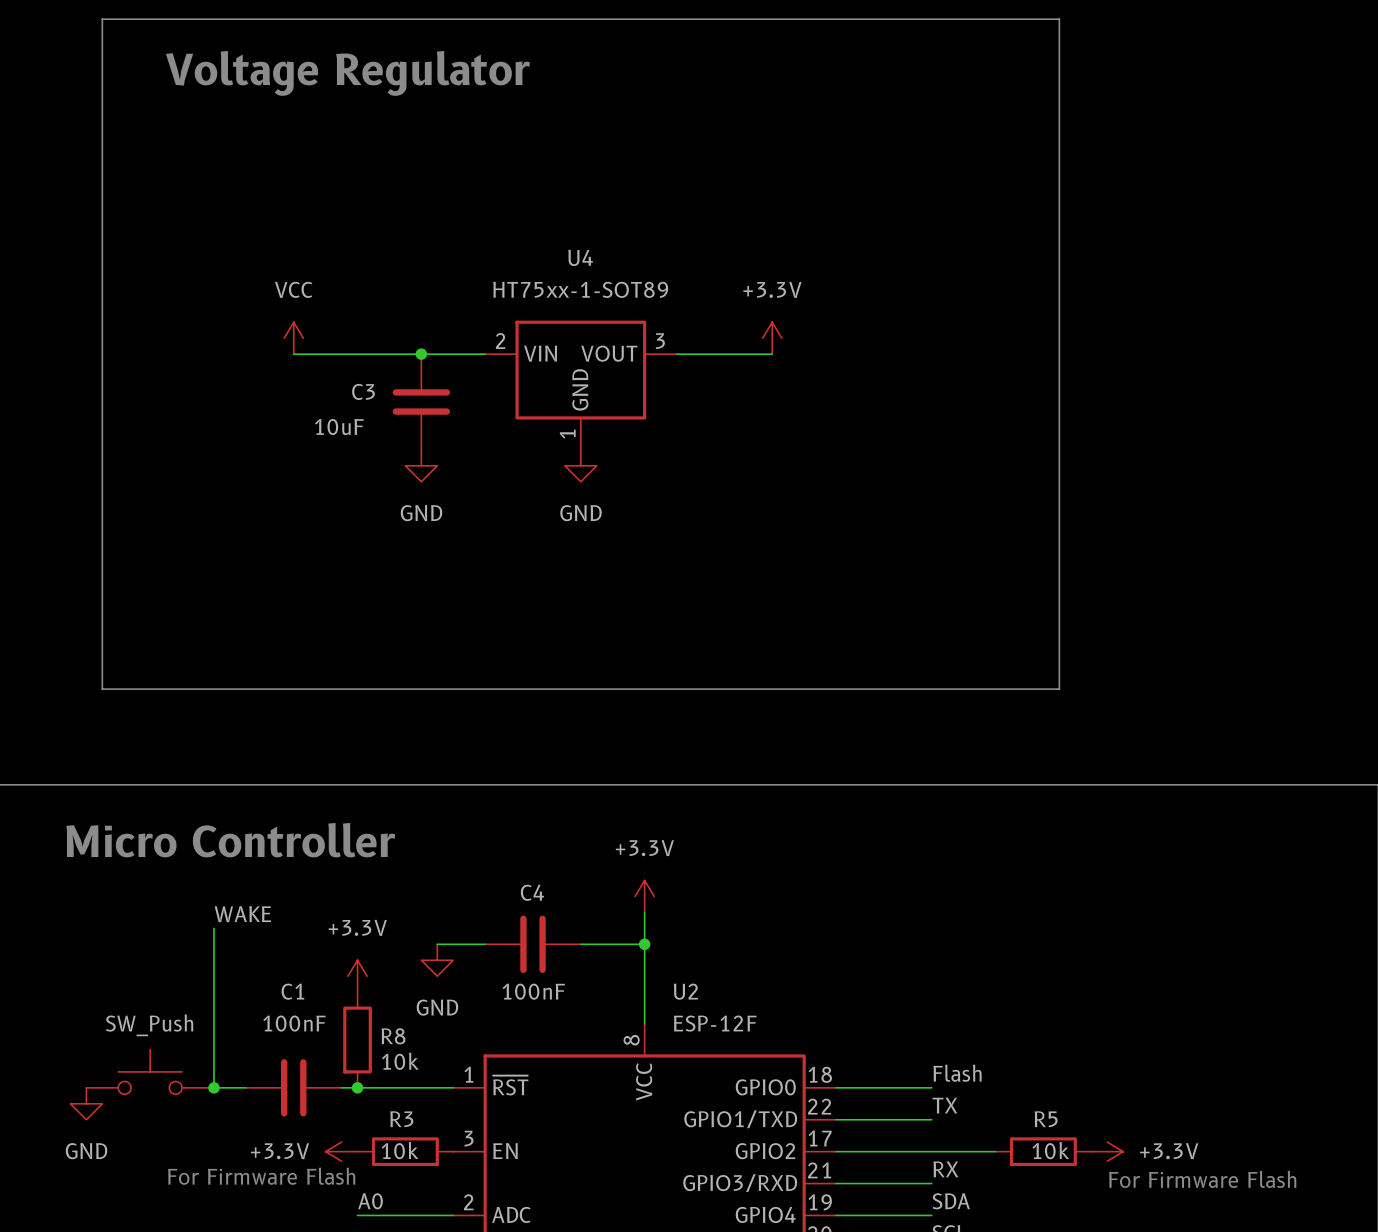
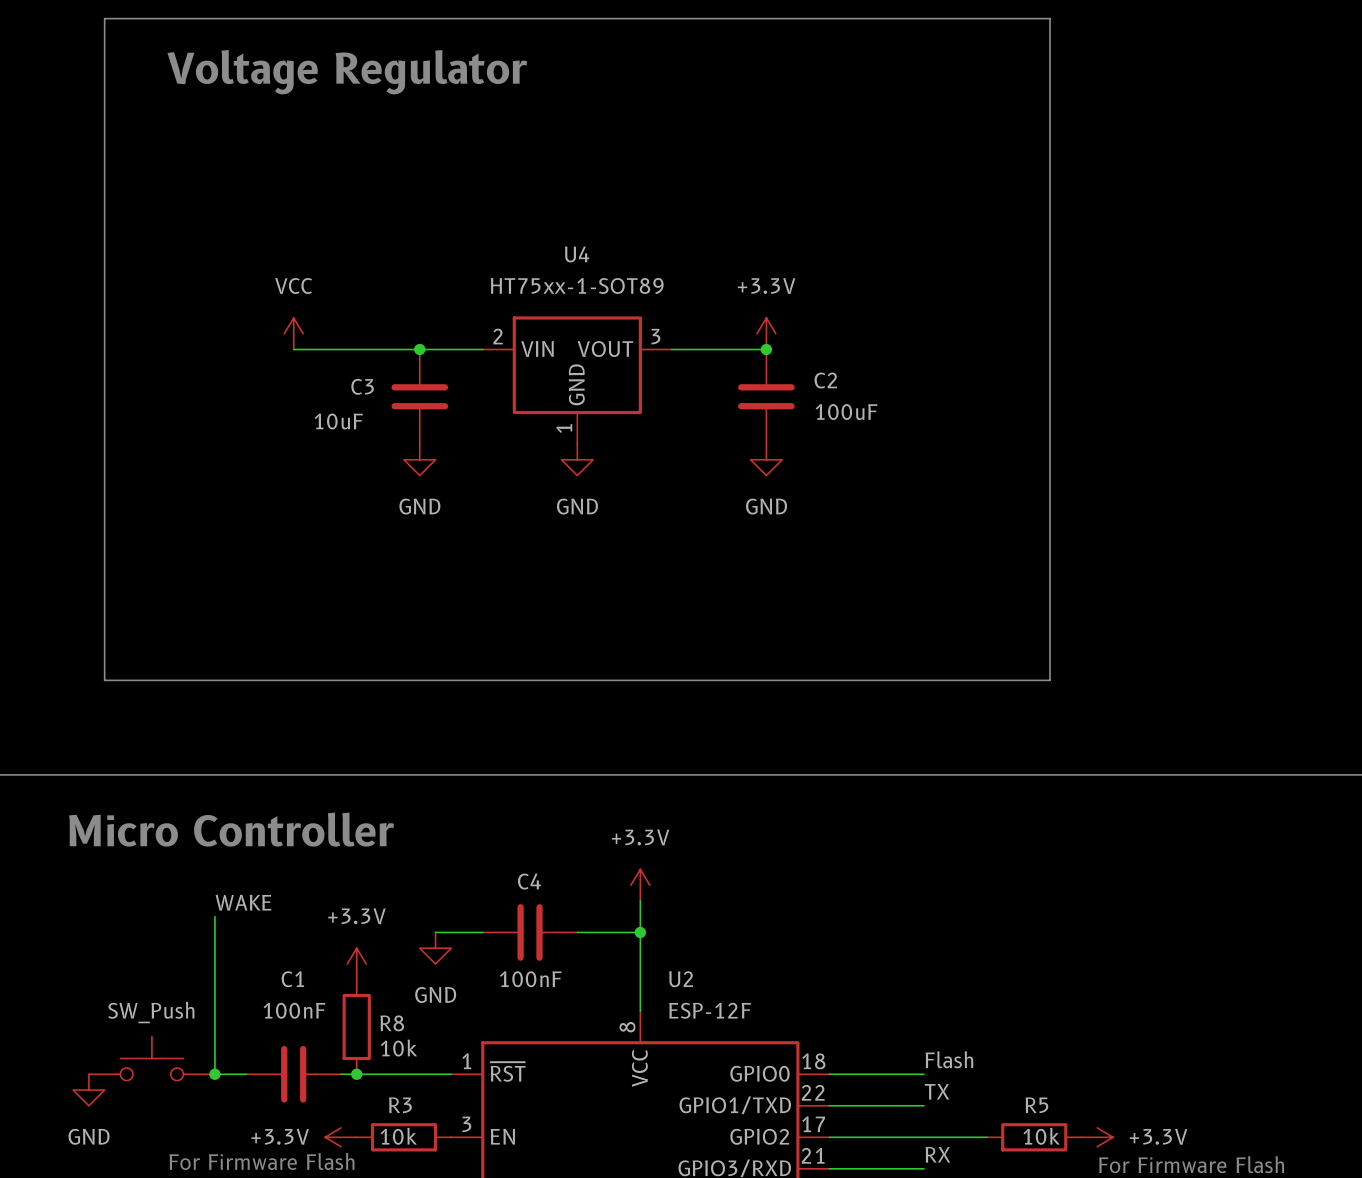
junction: none -> (766, 349)
C2: none -> 100uF (766, 396)
power symbol: none -> GND (766, 459)

